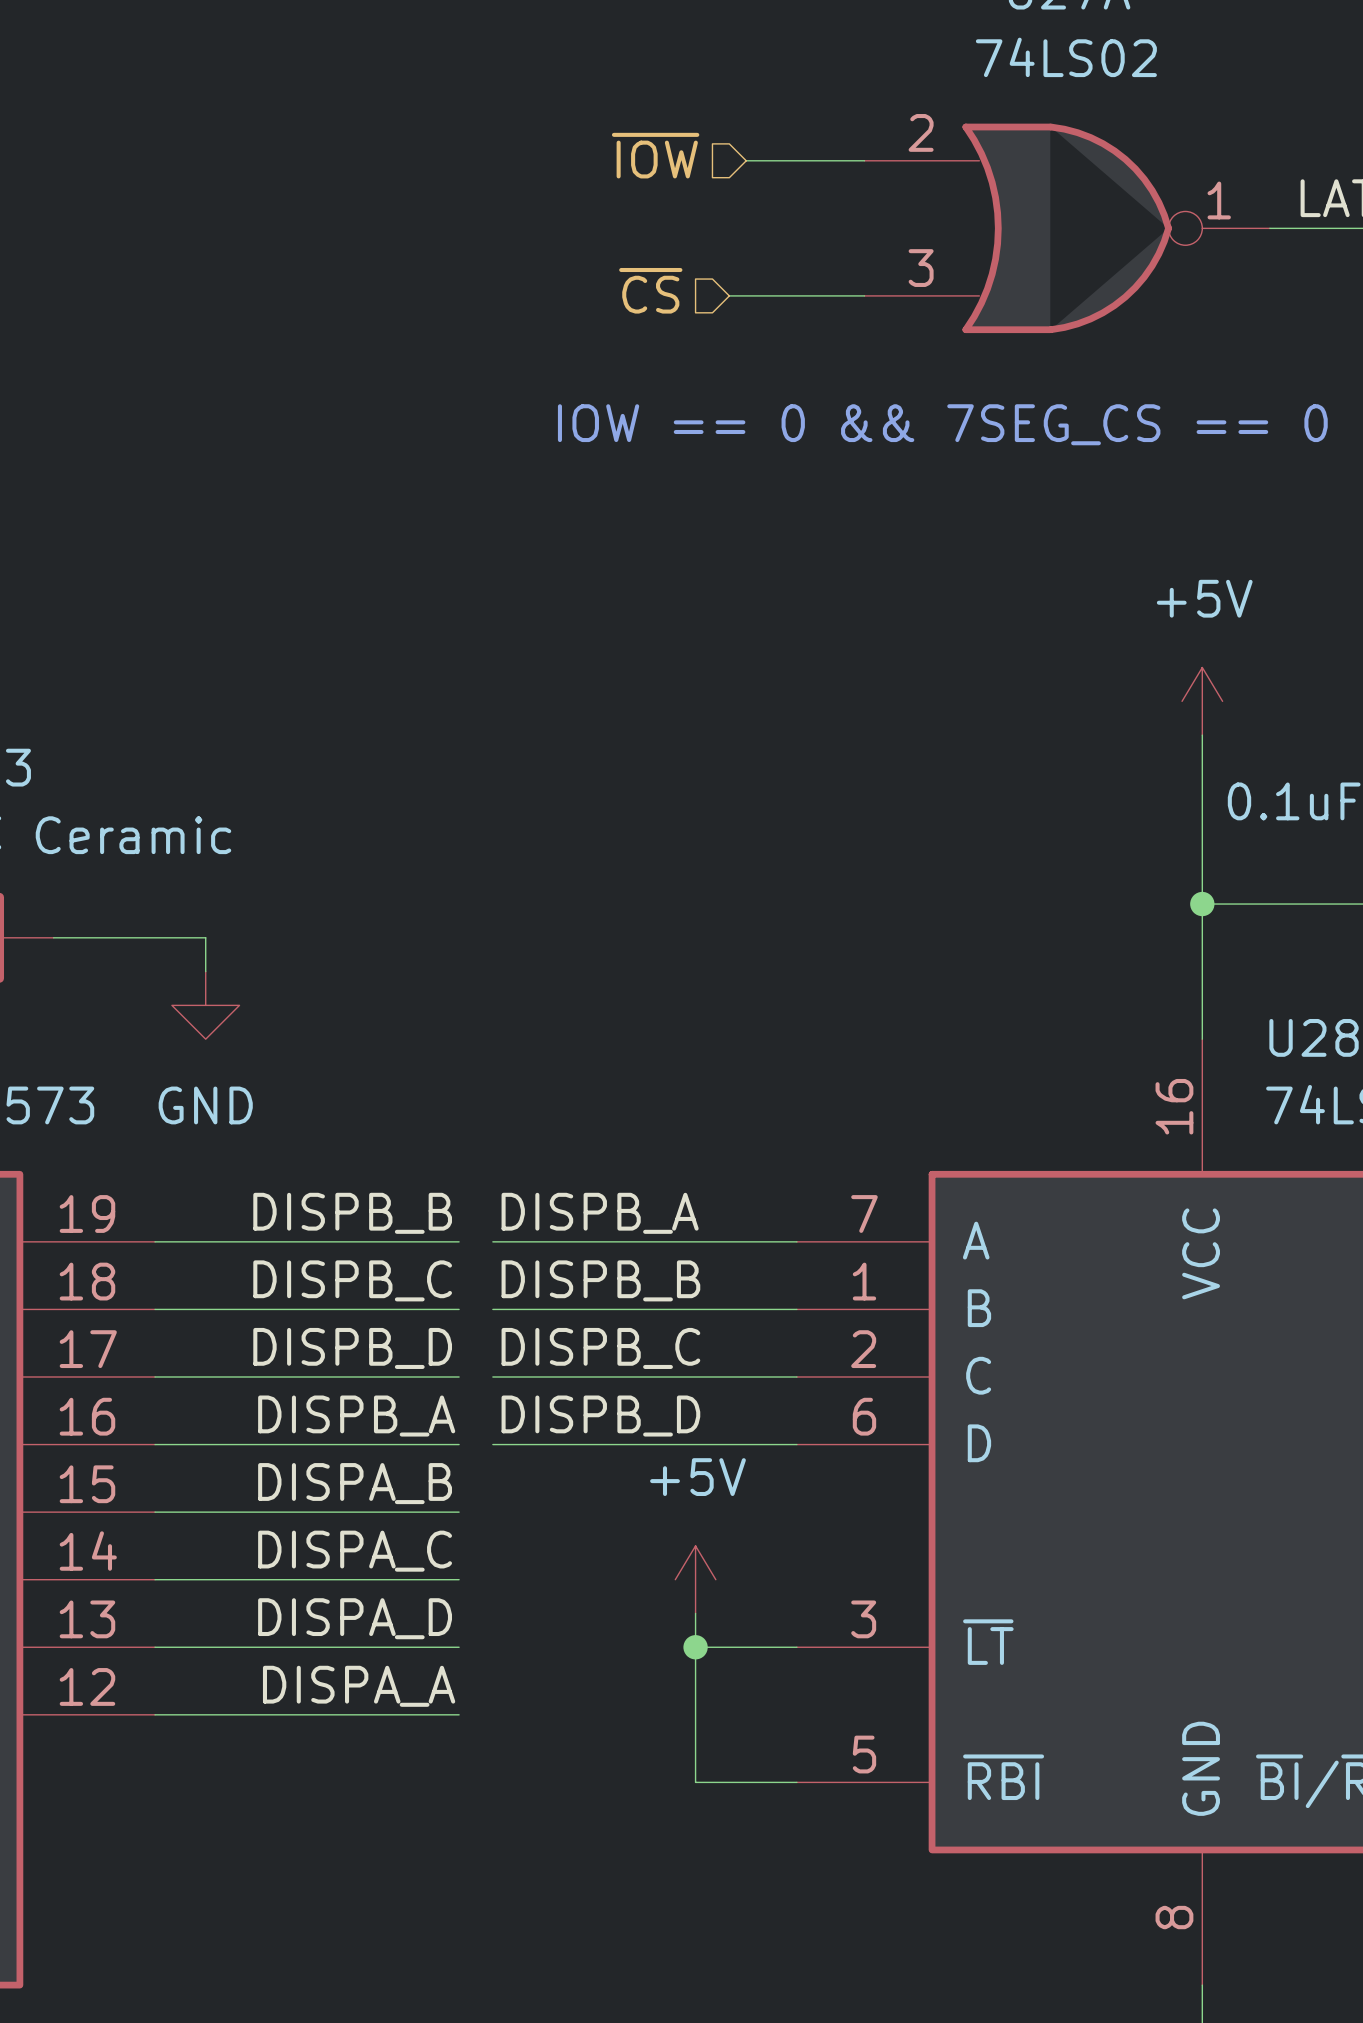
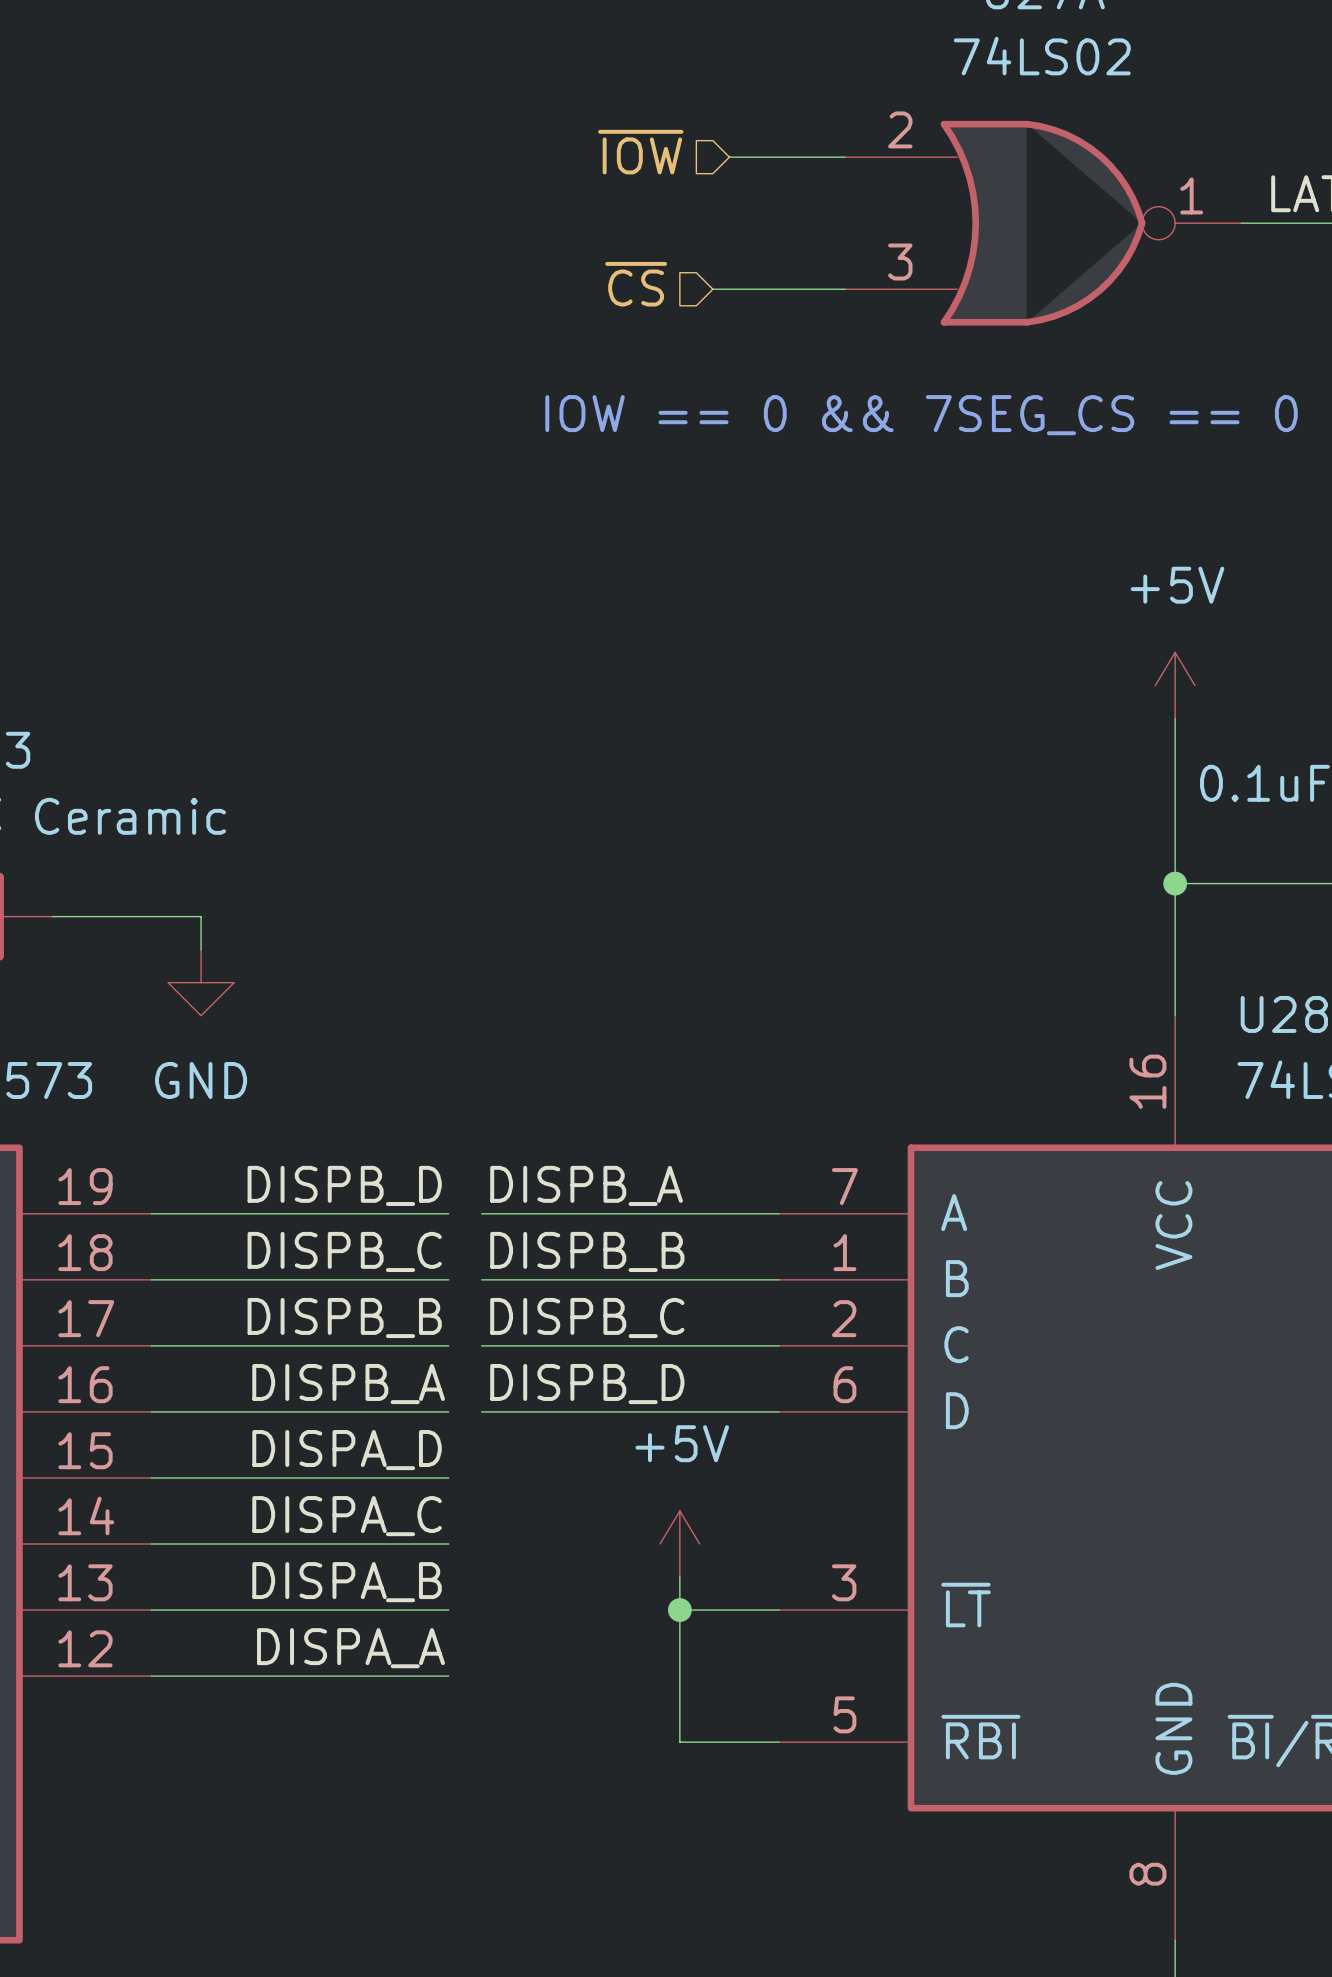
label: DISPB_B (352, 1213) -> DISPB_D (344, 1185)
label: DISPB_D (352, 1348) -> DISPB_B (344, 1317)
label: DISPA_B (355, 1483) -> DISPA_D (347, 1450)
label: DISPA_D (355, 1618) -> DISPA_B (347, 1582)

